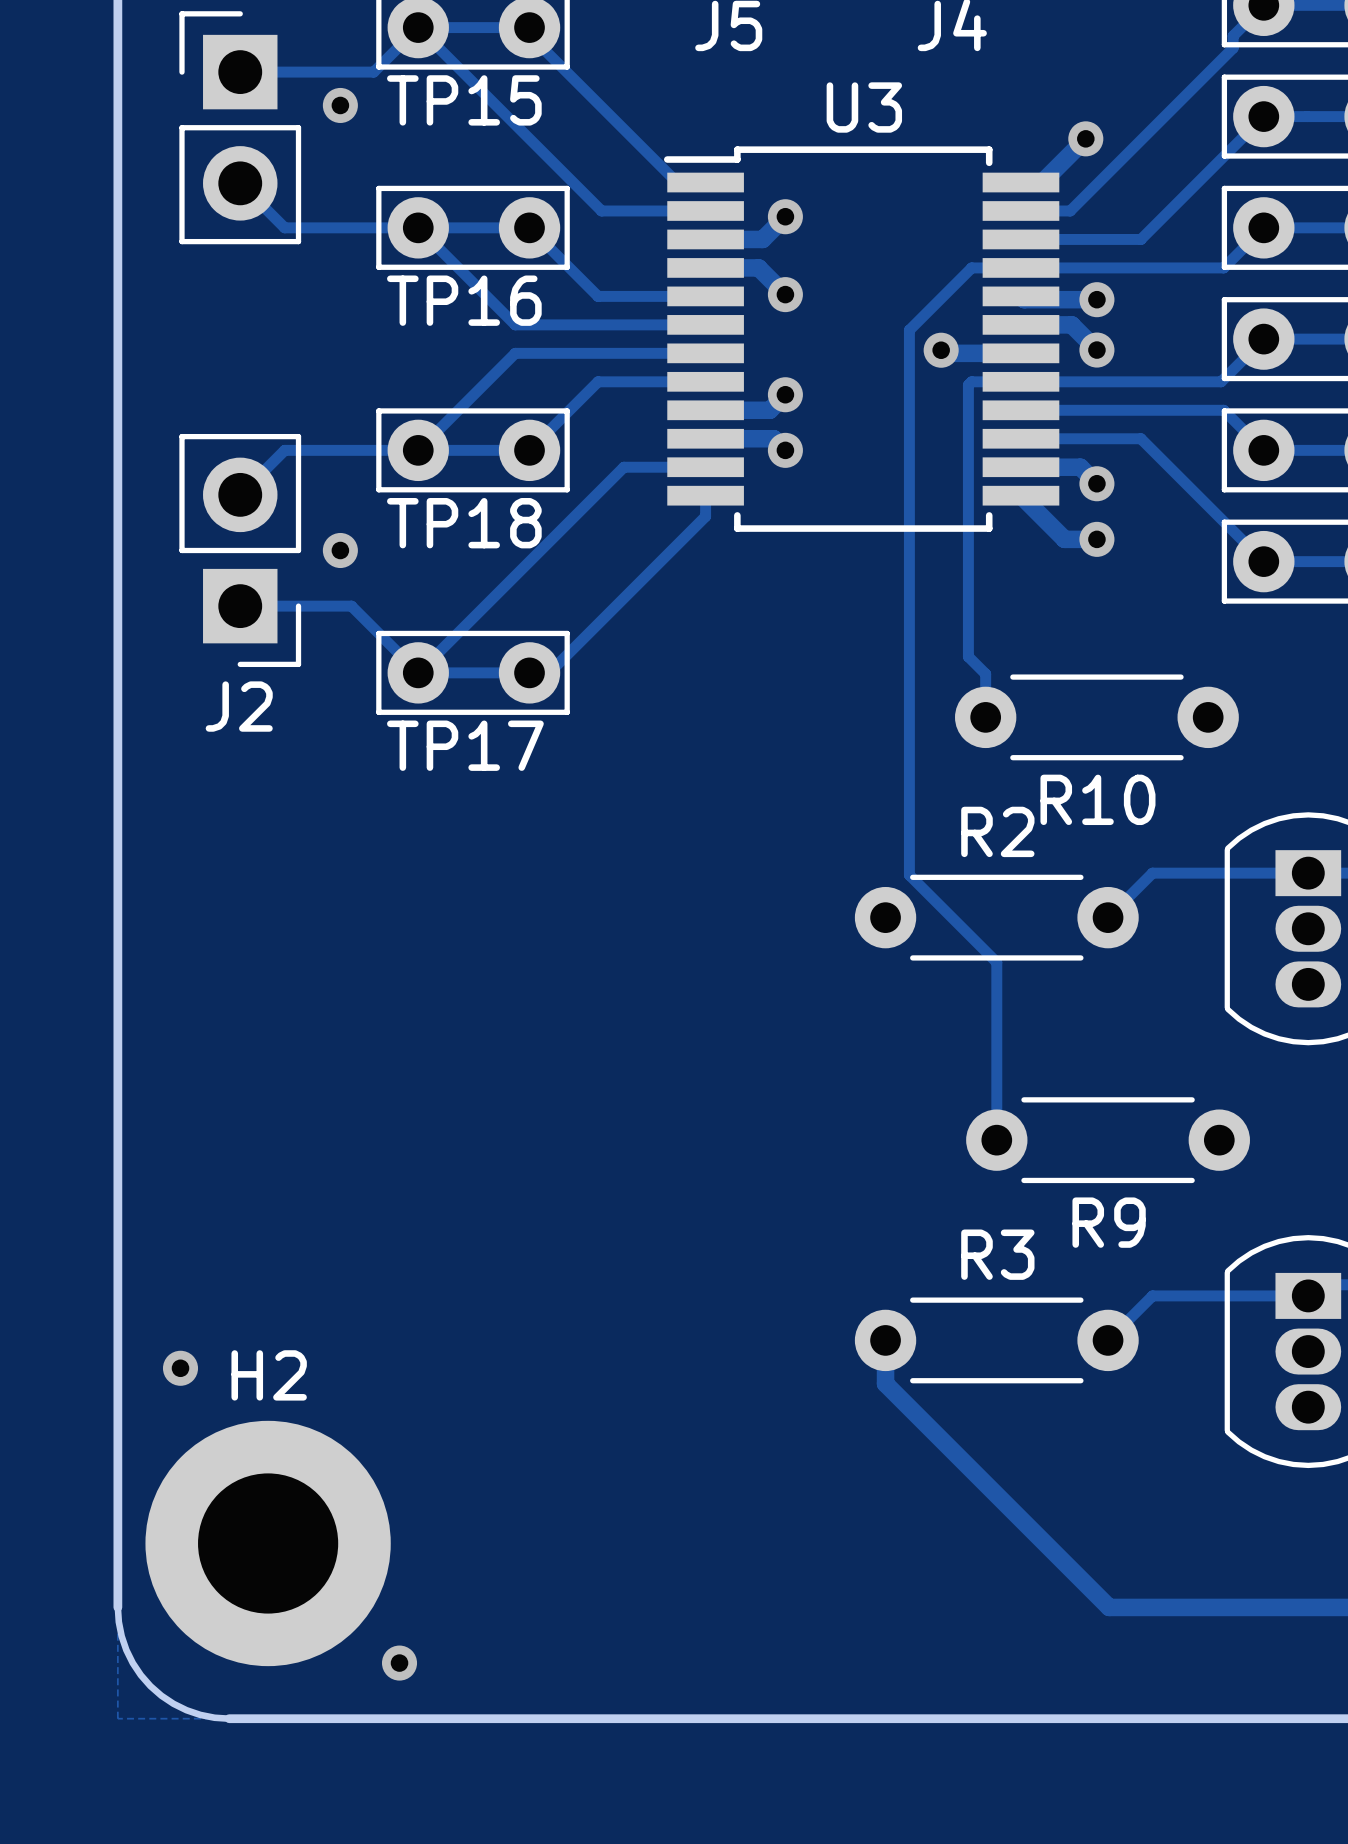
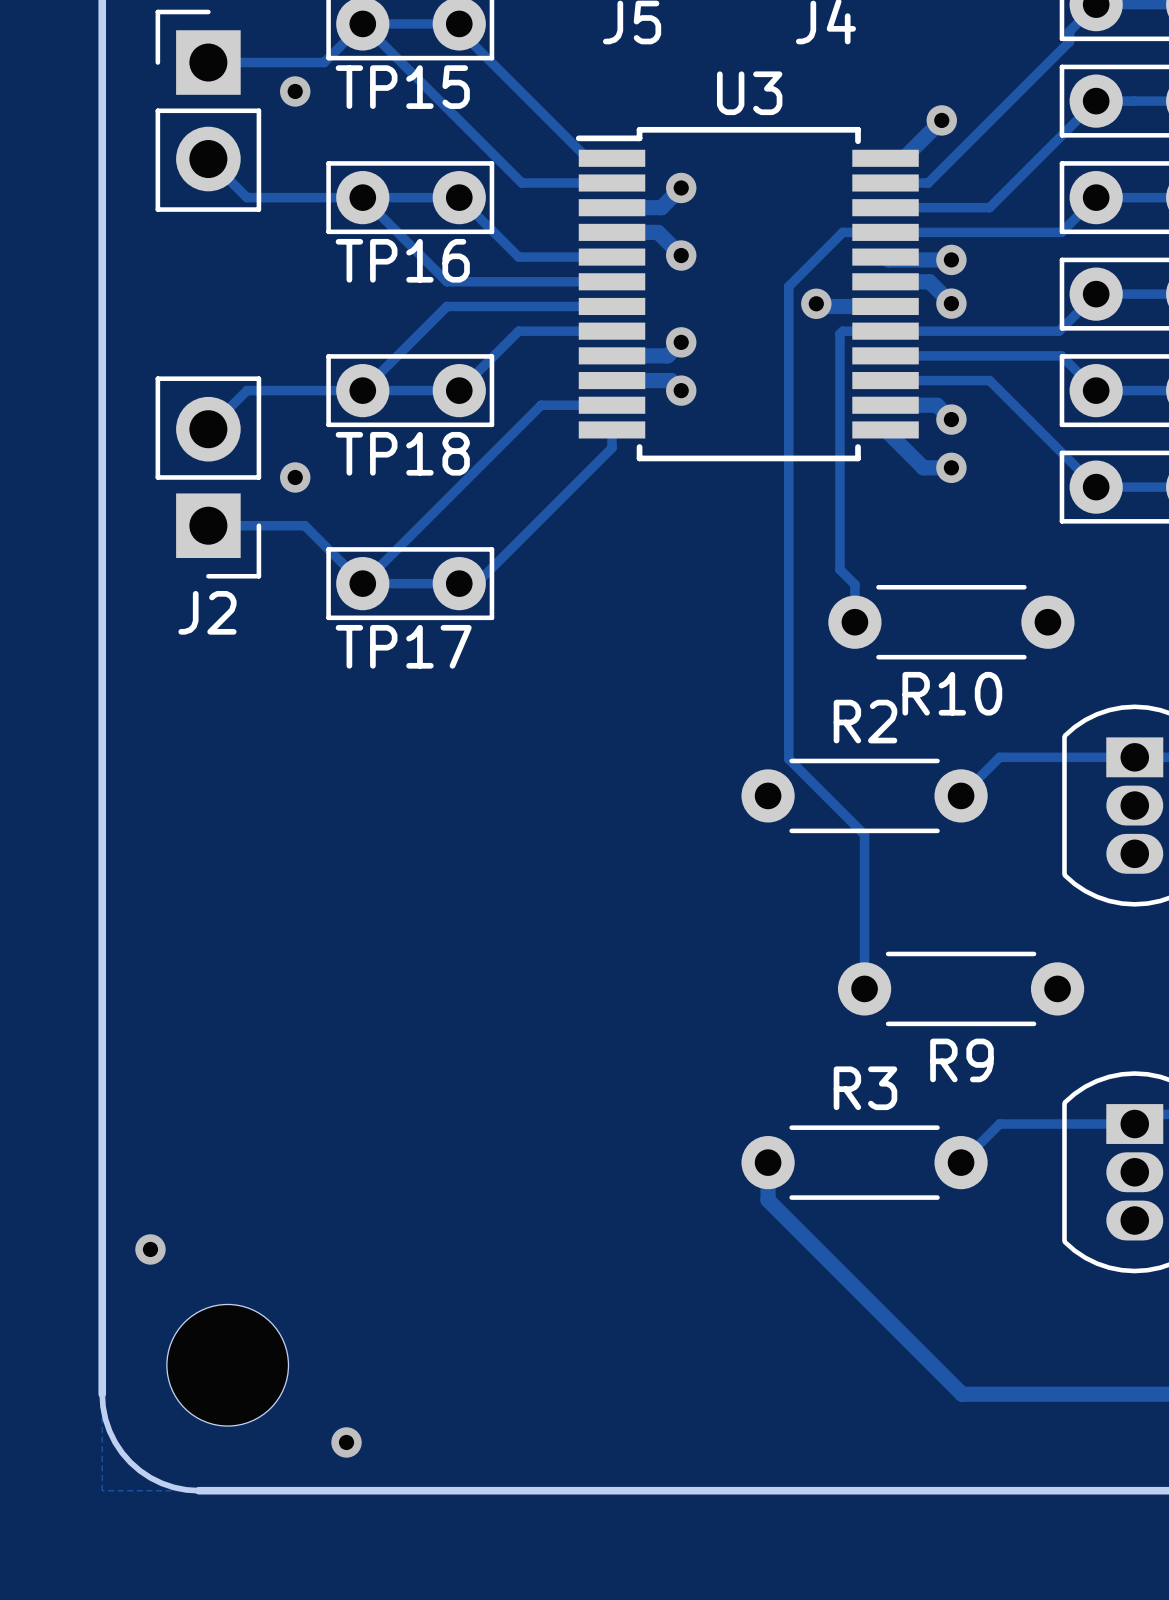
via position: (180, 1368) -> (150, 1249)
H2: (268, 1543) -> none
part: none -> (227, 1365)

